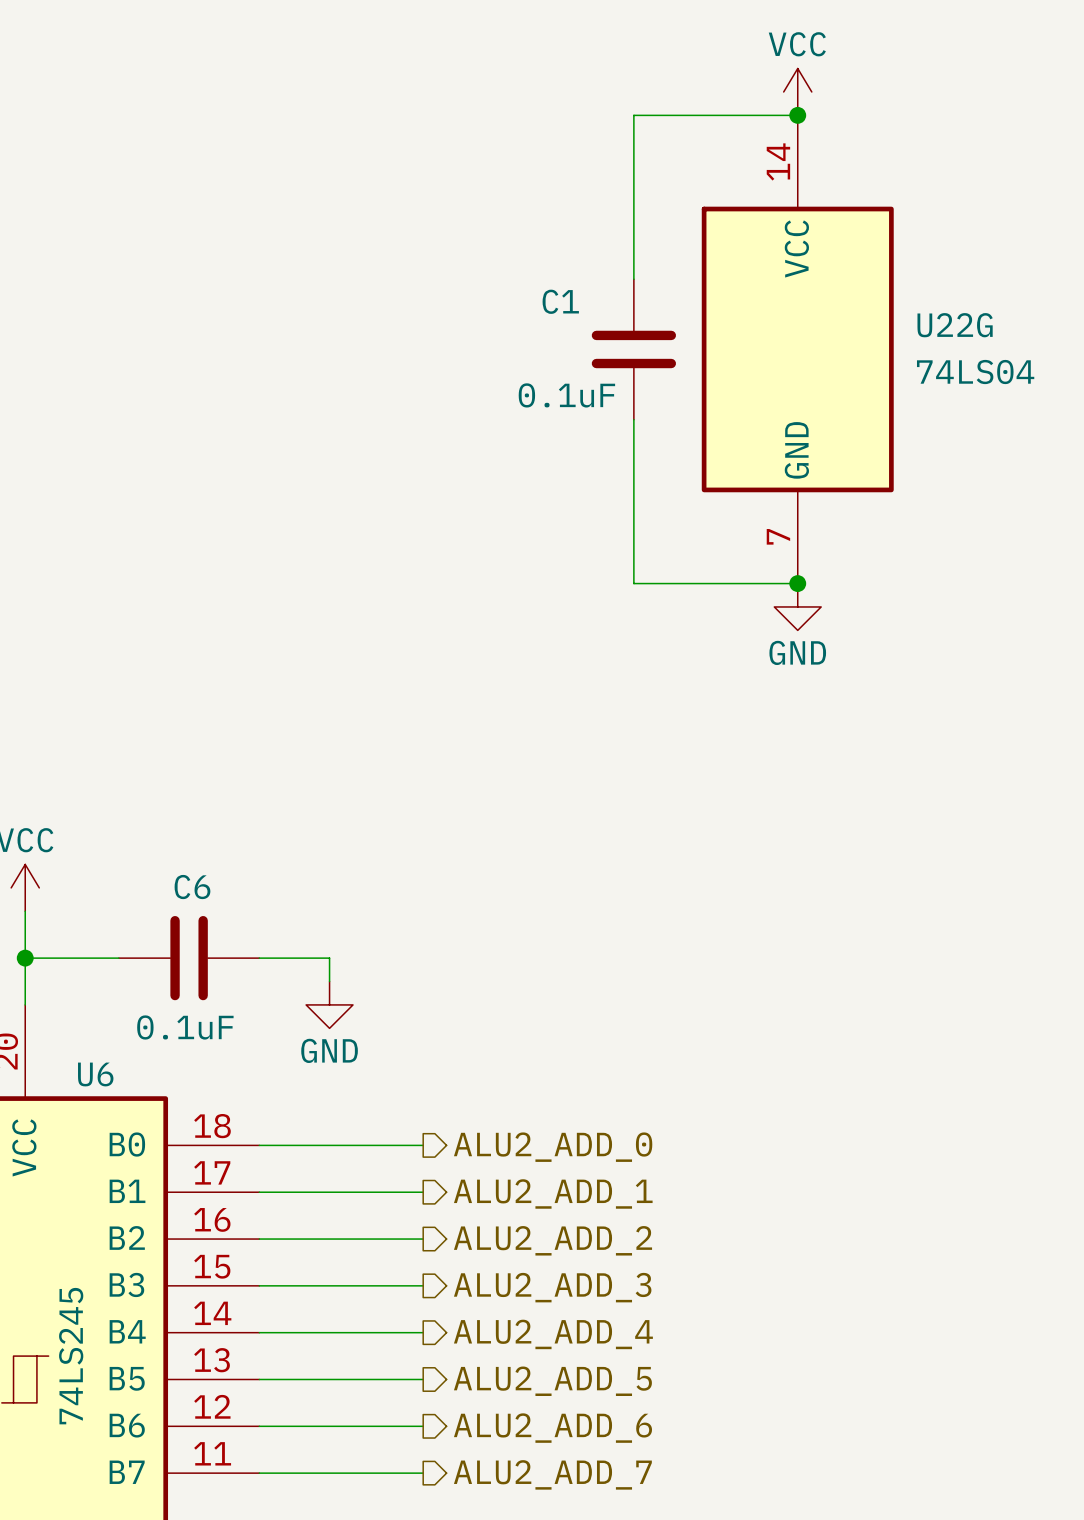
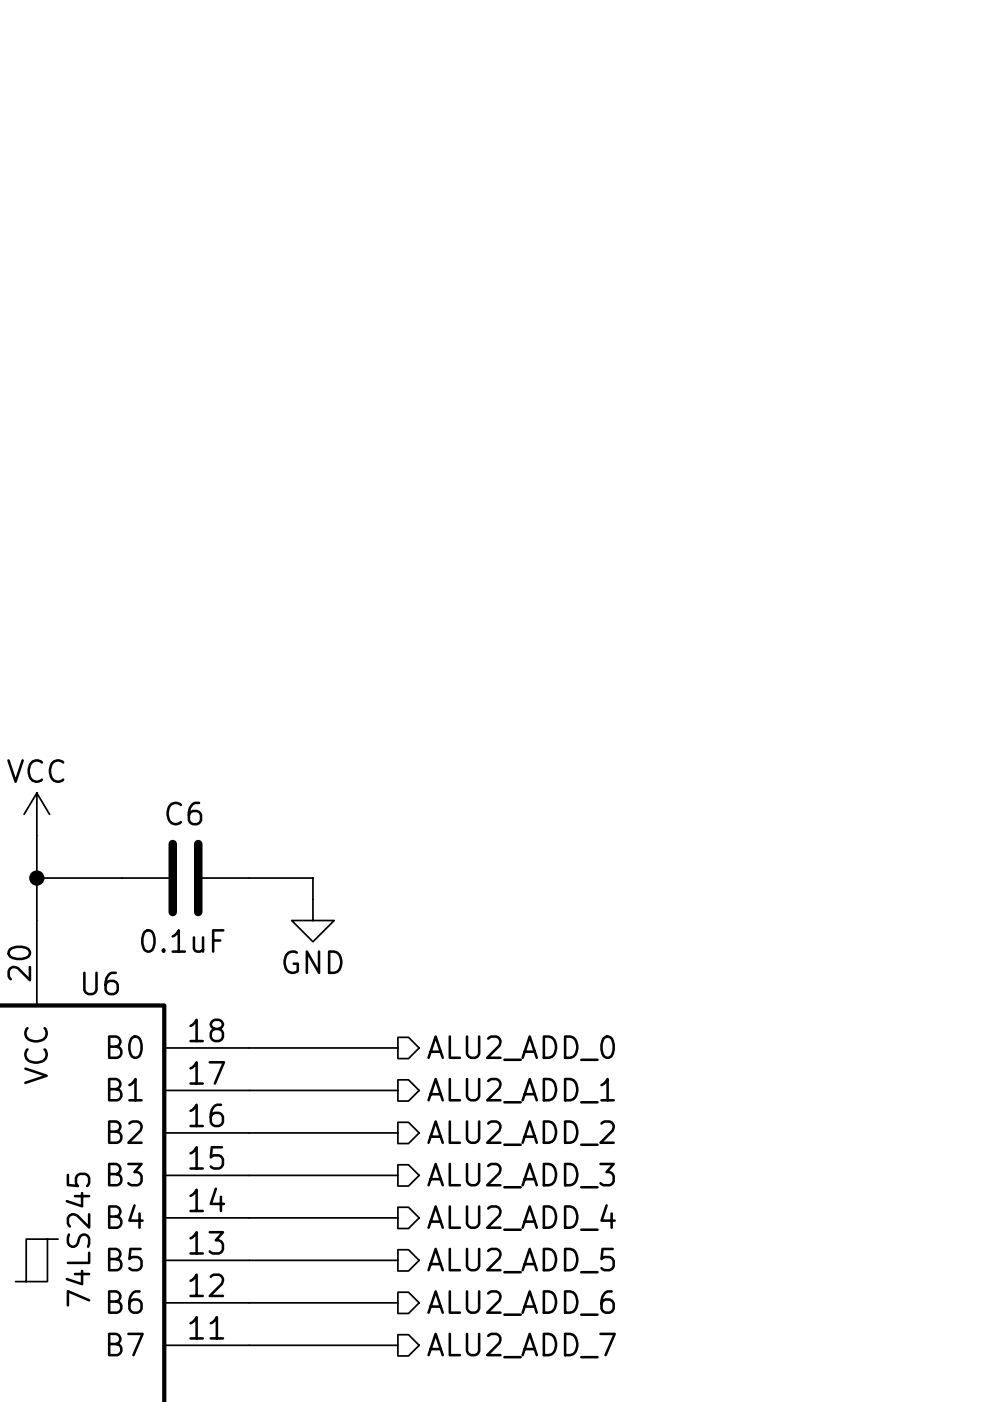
power symbol: VCC (797, 91) -> none
wire: (797, 115) (633, 115) (633, 279) -> none
junction: (797, 115) -> none
C1: 0.1uF (633, 349) -> none
U22G: 74LS04 (797, 349) -> none
wire: (633, 419) (633, 583) (797, 583) -> none
junction: (797, 583) -> none
power symbol: GND (797, 606) -> none

